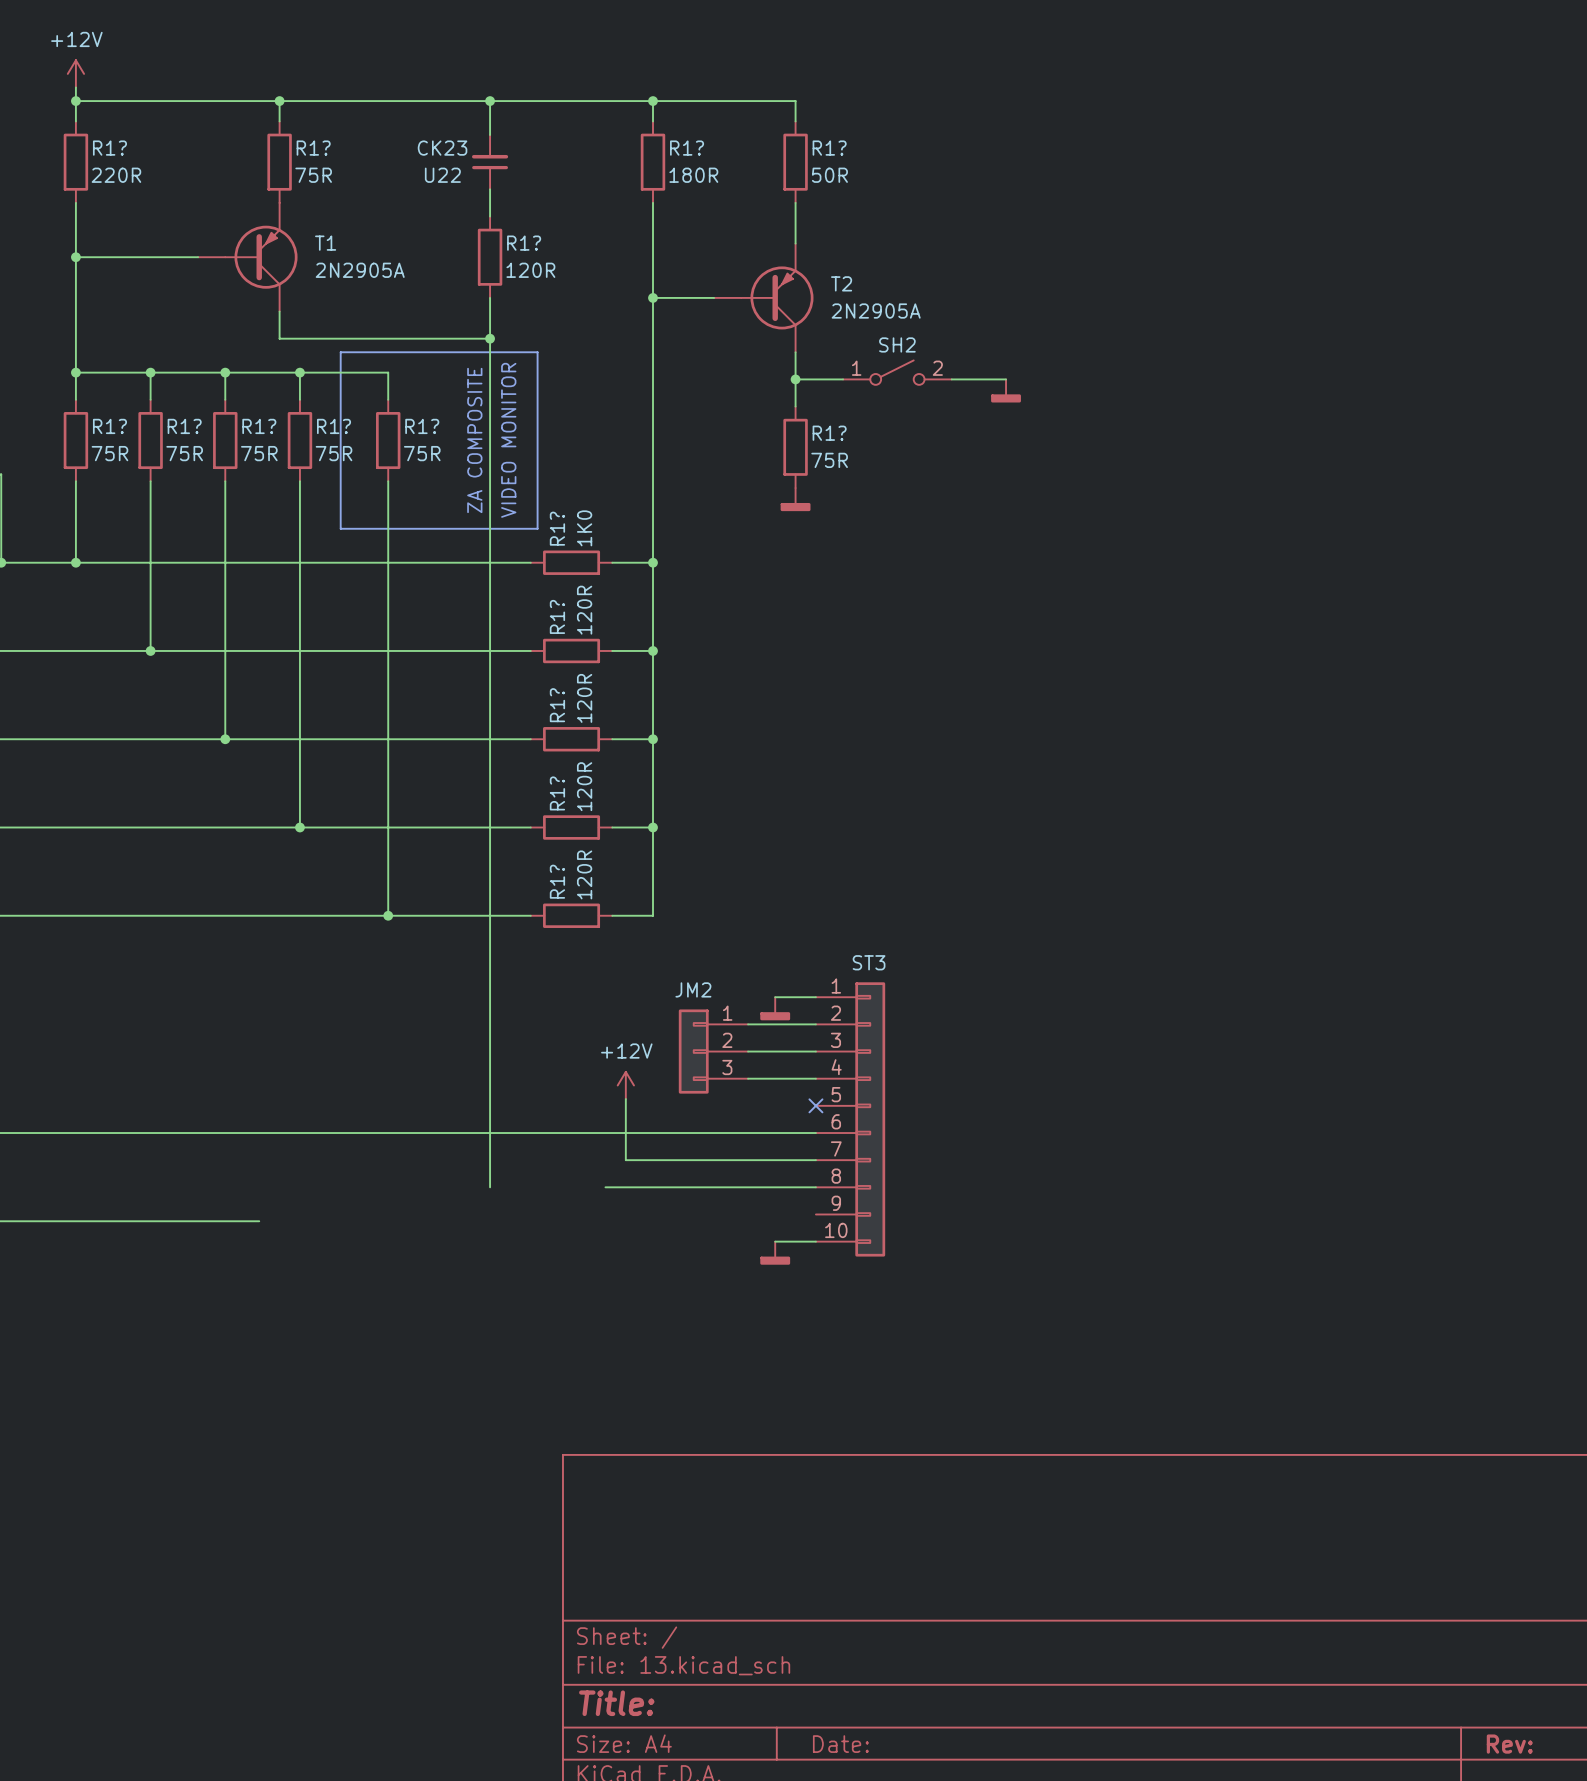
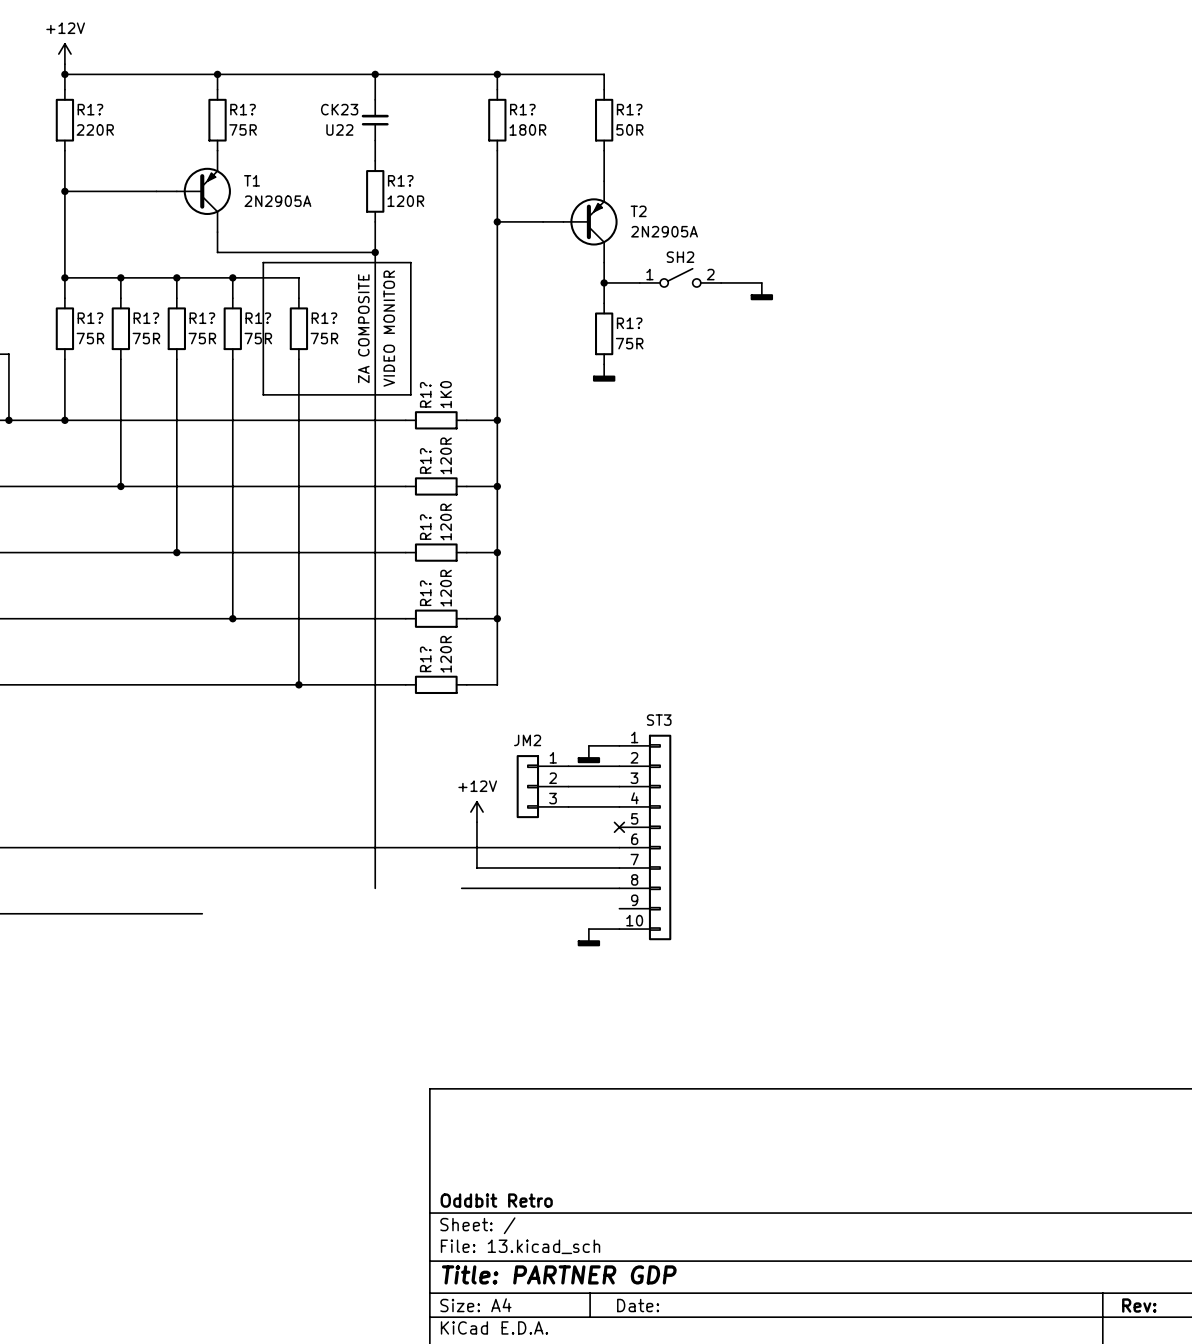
title block: none -> Oddbit Retro (496, 1200)
title block: Title: (616, 1703) -> Title: PARTNER GDP (559, 1274)

